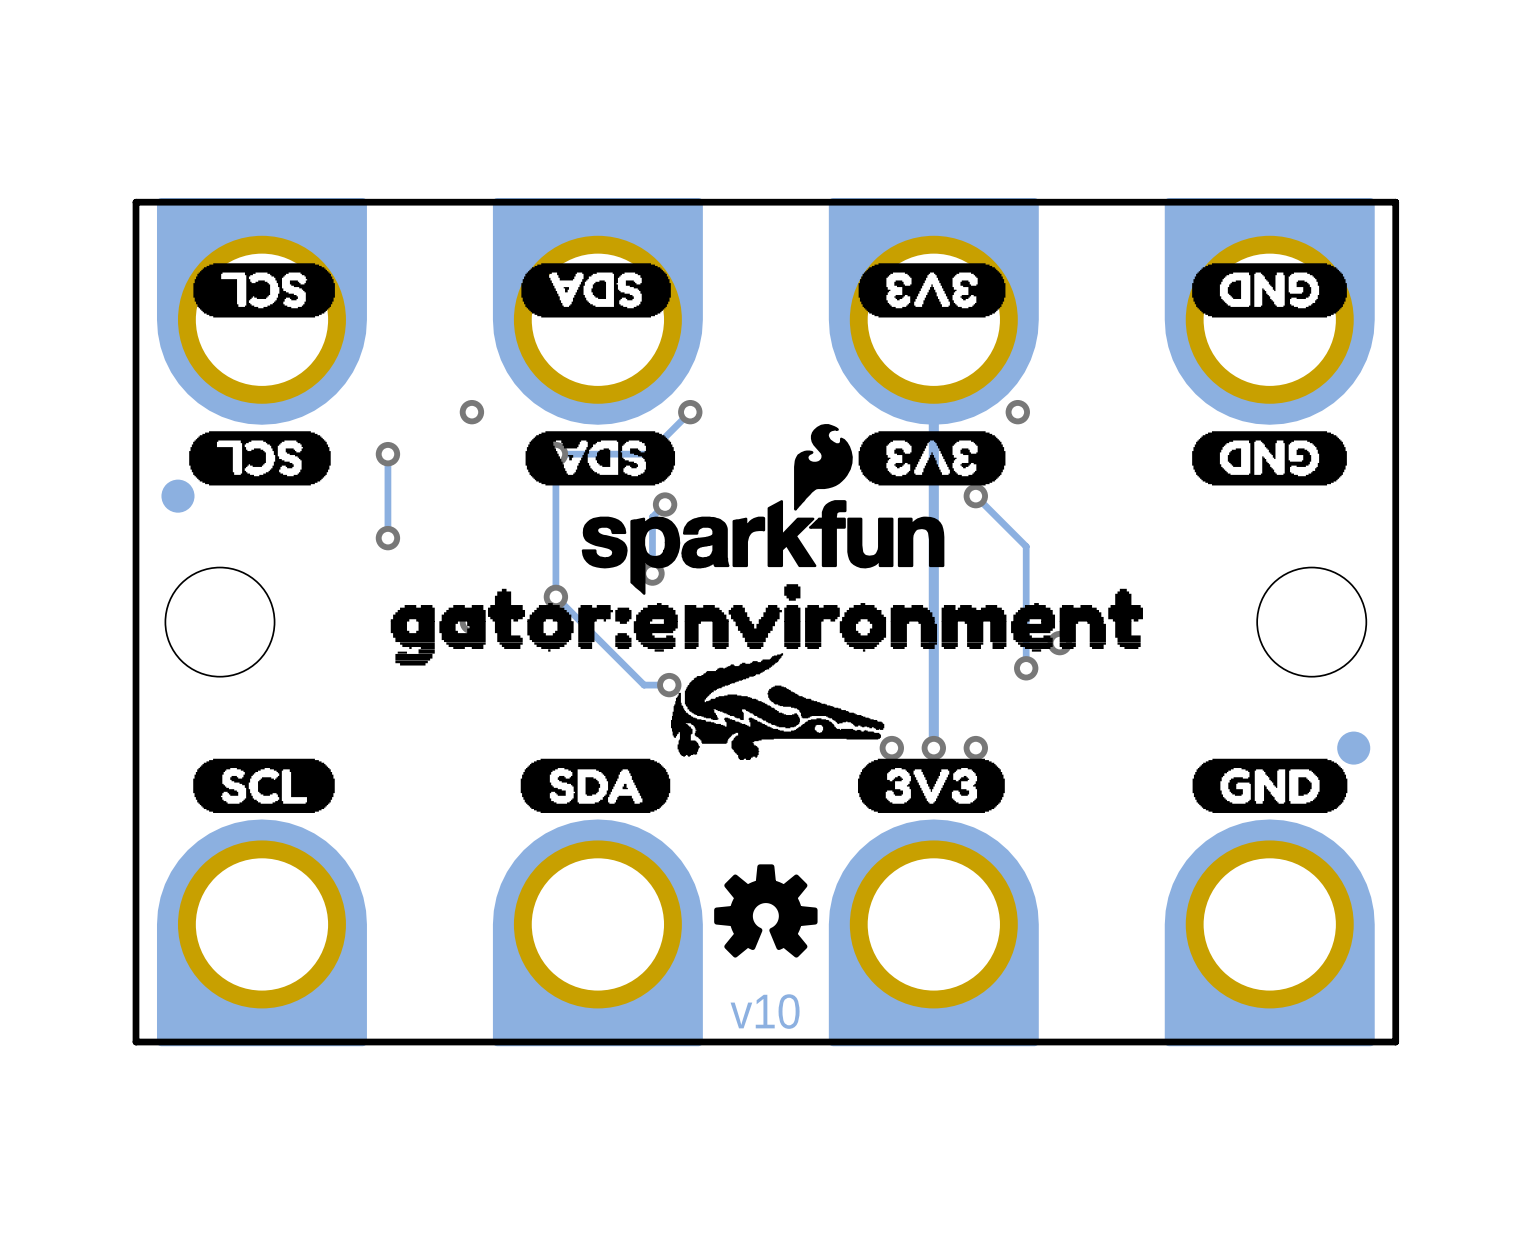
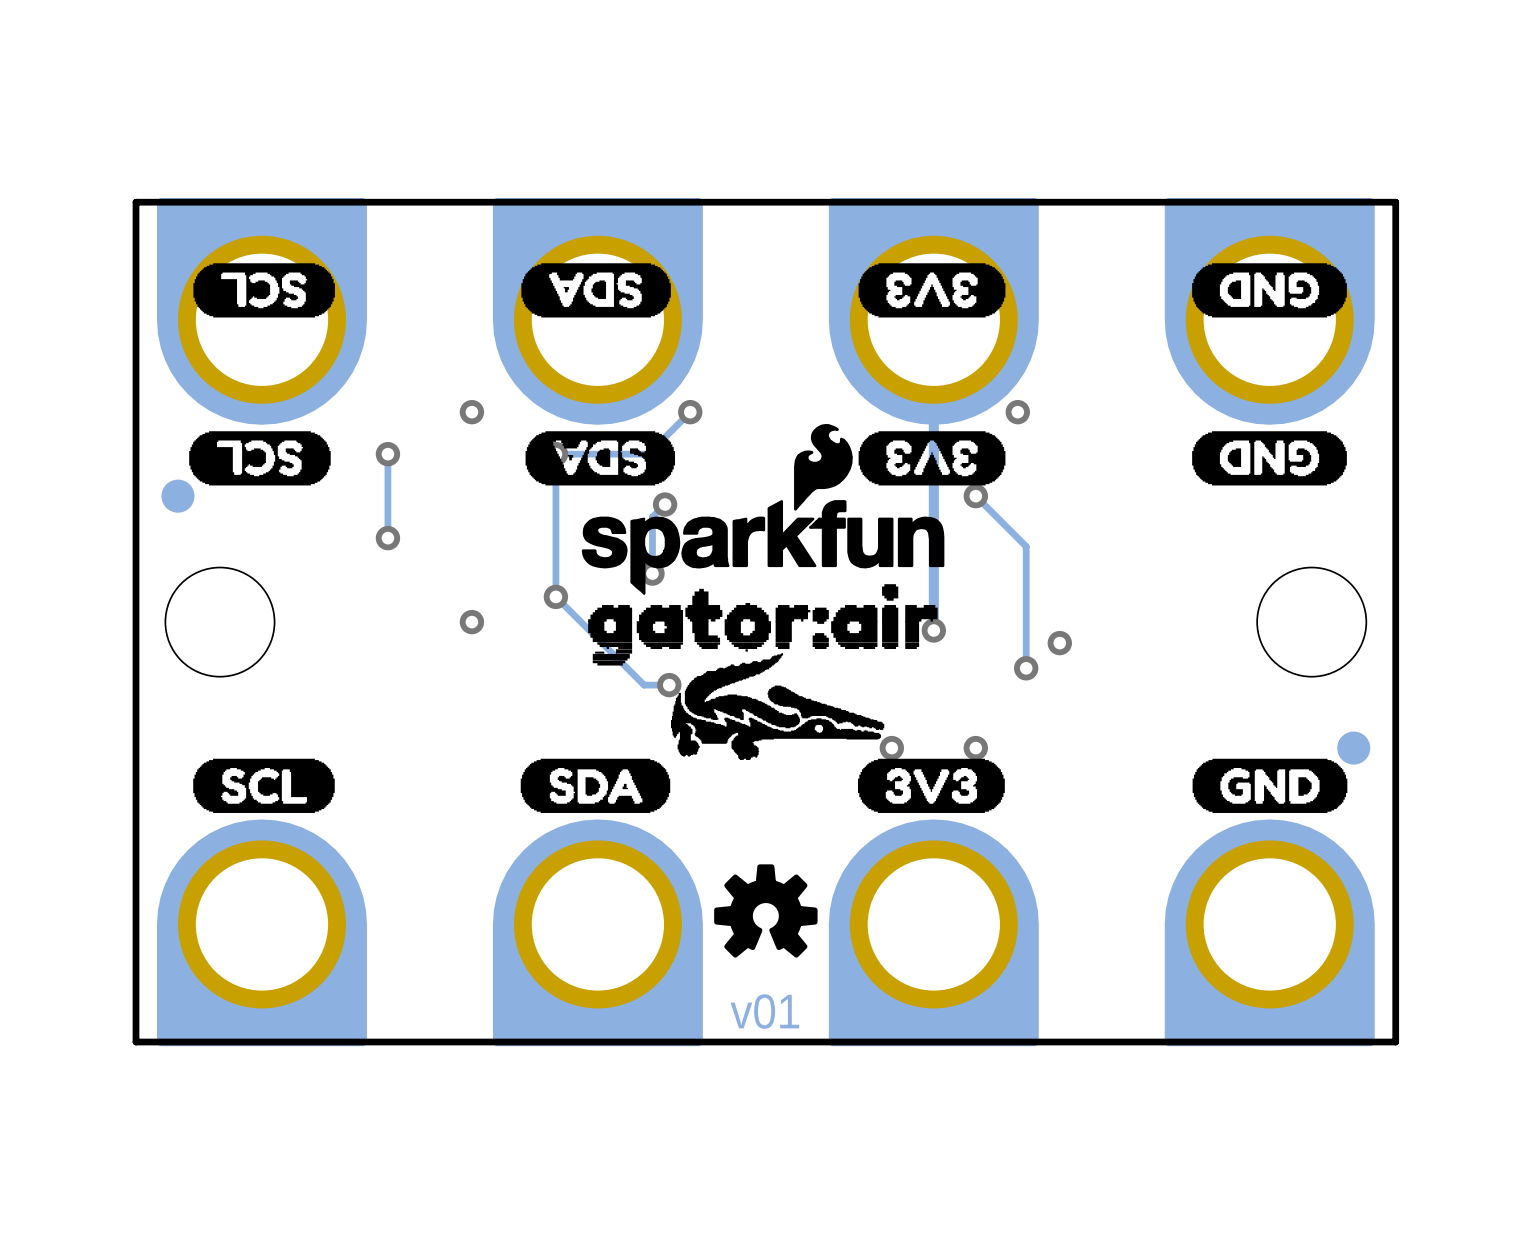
drawing shape: [390, 584, 1143, 666] -> [588, 584, 938, 666]
track: (933, 630) (933, 748) -> none
via position: (933, 748) -> (933, 630)
text: v10 (765, 1011) -> v01 (764, 1011)

